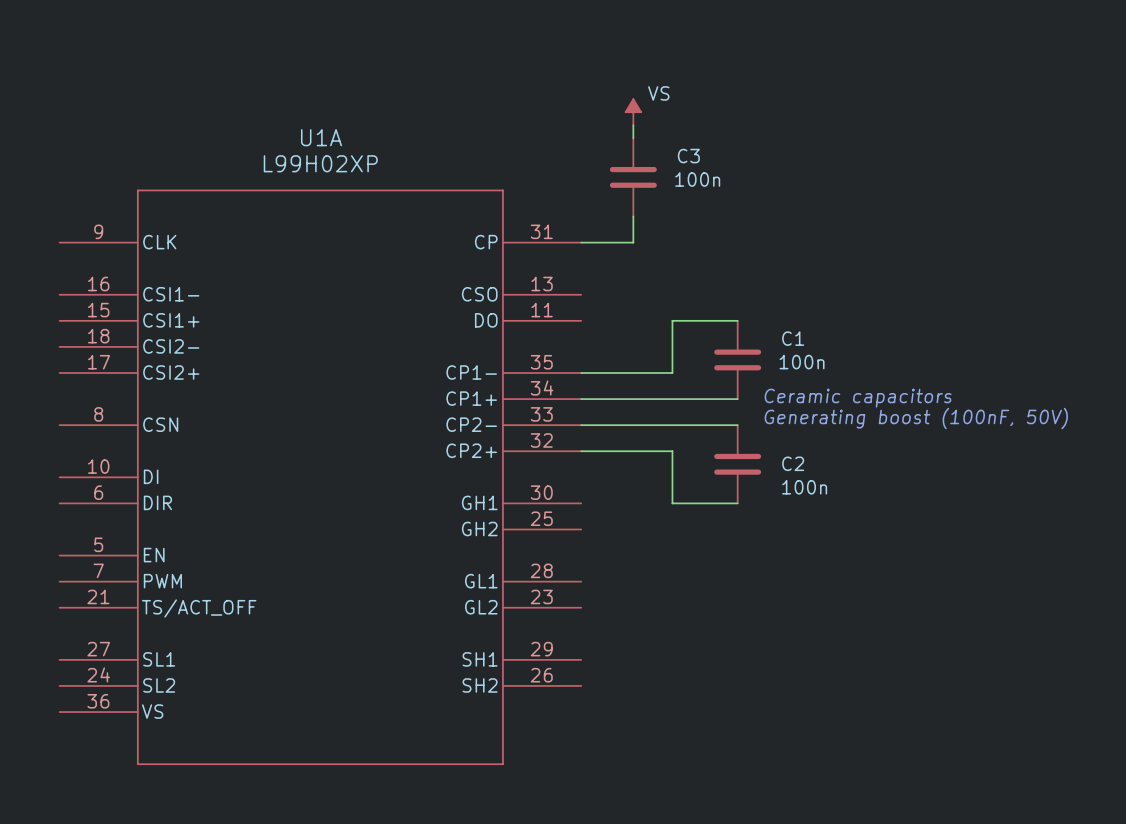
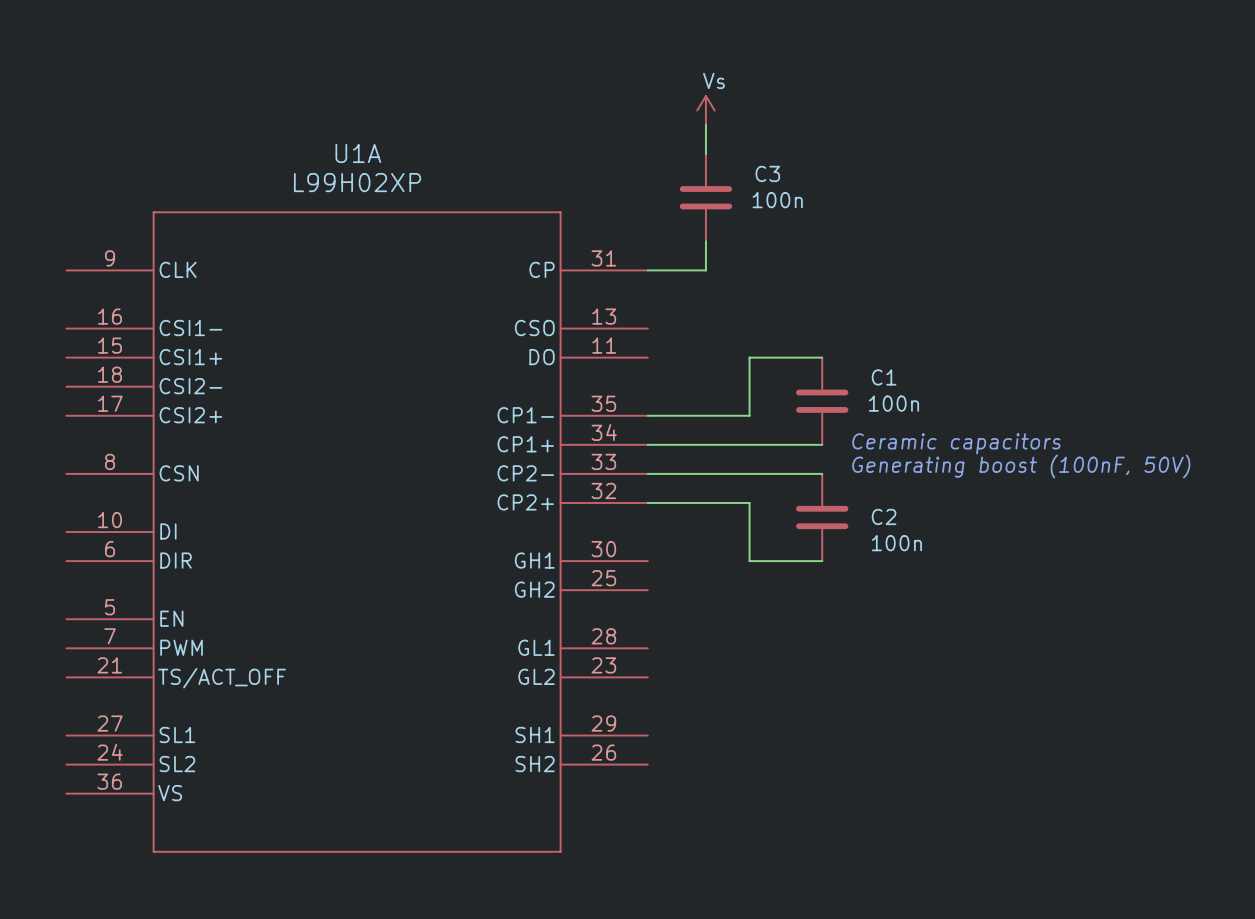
power symbol: none -> Vs (705, 110)
power symbol: VS (633, 112) -> none

